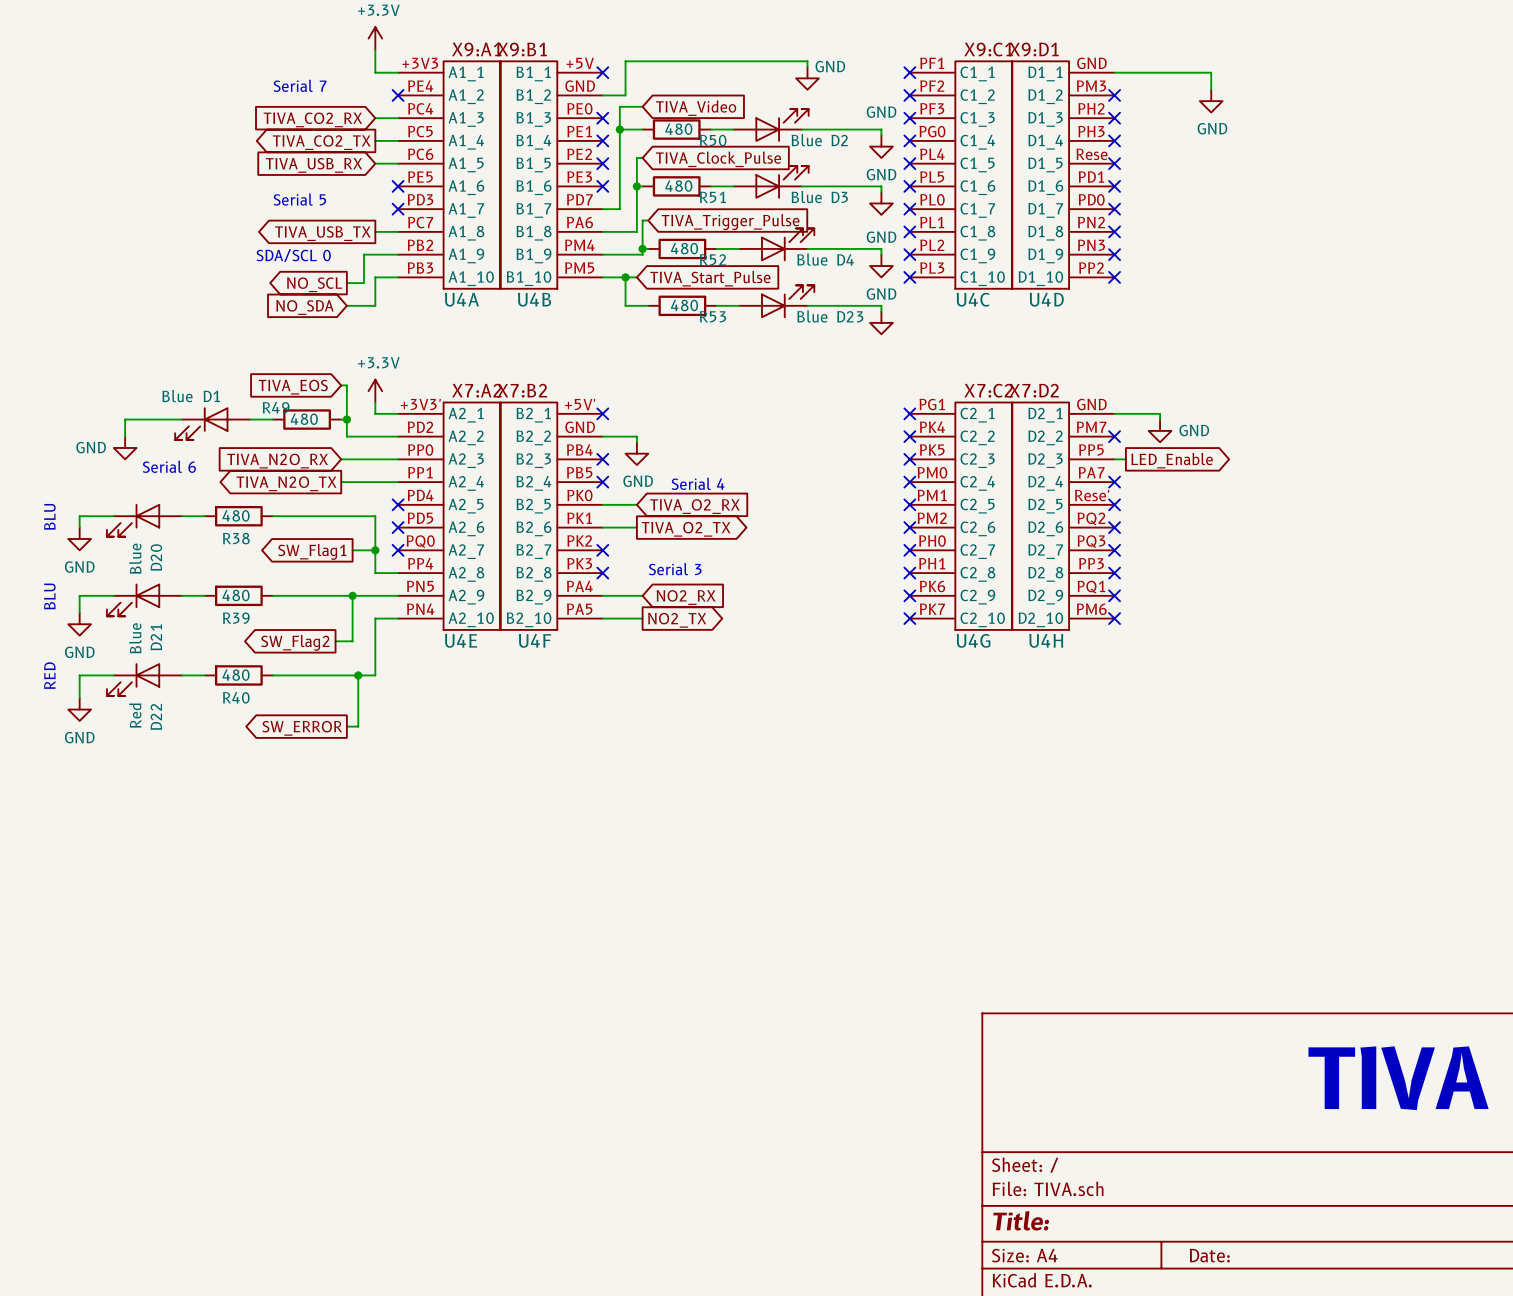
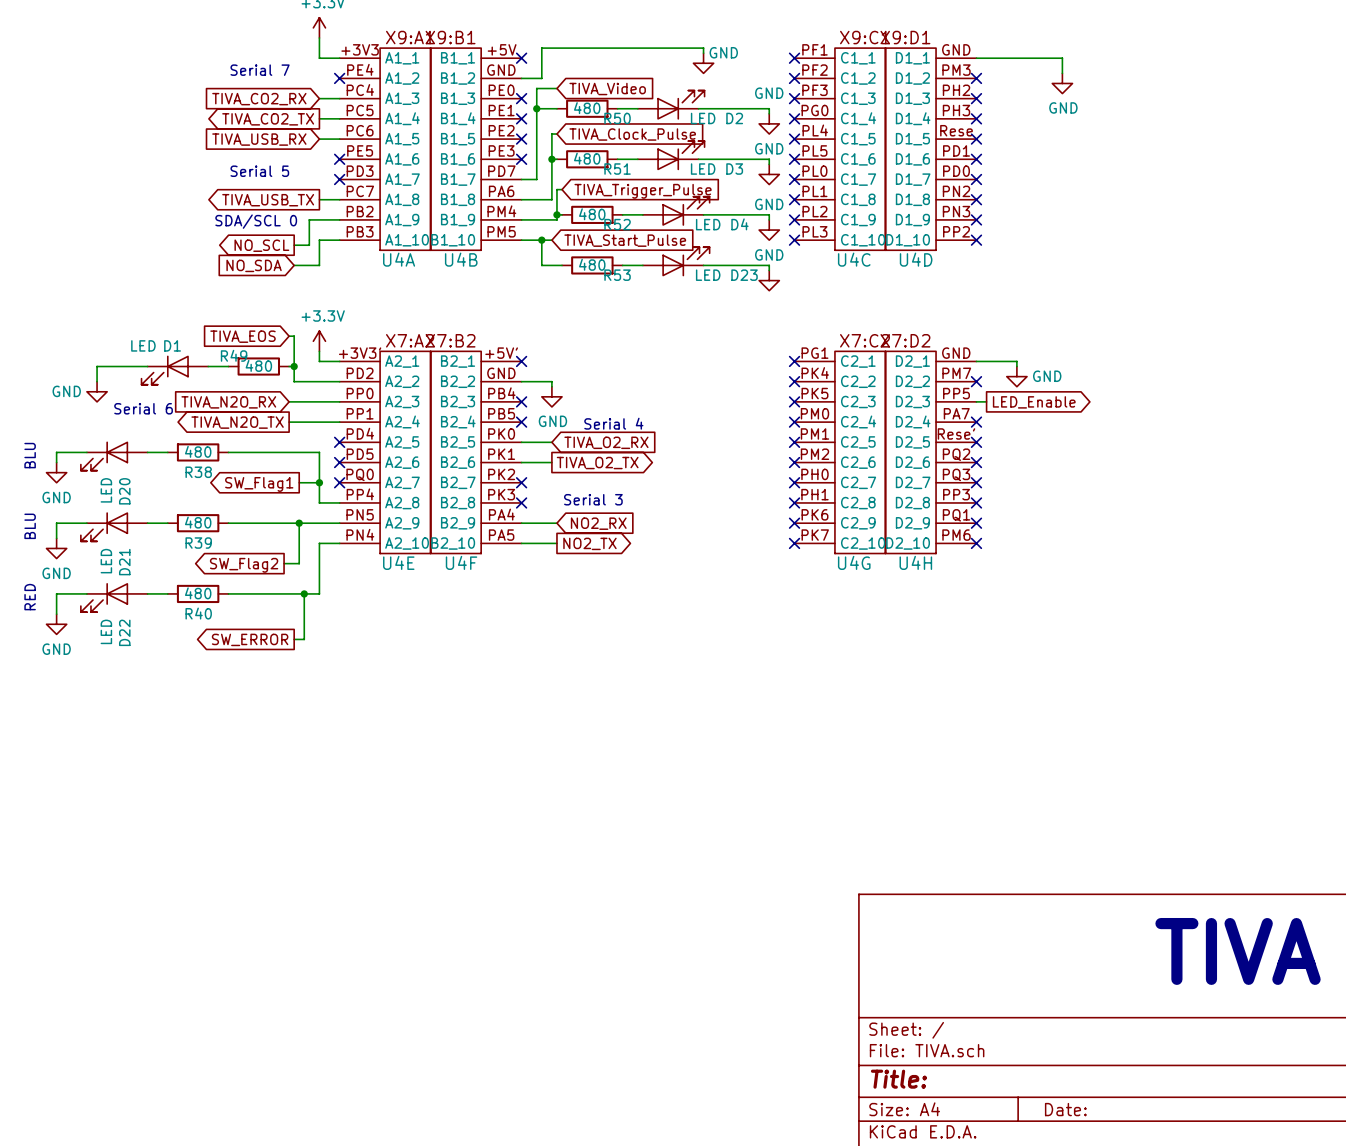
D2 value: Blue (806, 140) -> LED (703, 118)
D3 value: Blue (806, 197) -> LED (703, 169)
D4 value: Blue (812, 259) -> LED (708, 224)
D23 value: Blue (812, 316) -> LED (708, 275)
D1 value: Blue (177, 396) -> LED (143, 345)
D20 value: Blue (135, 558) -> LED (106, 490)
D21 value: Blue (135, 638) -> LED (106, 561)
D22 value: Red (135, 715) -> LED (106, 631)

